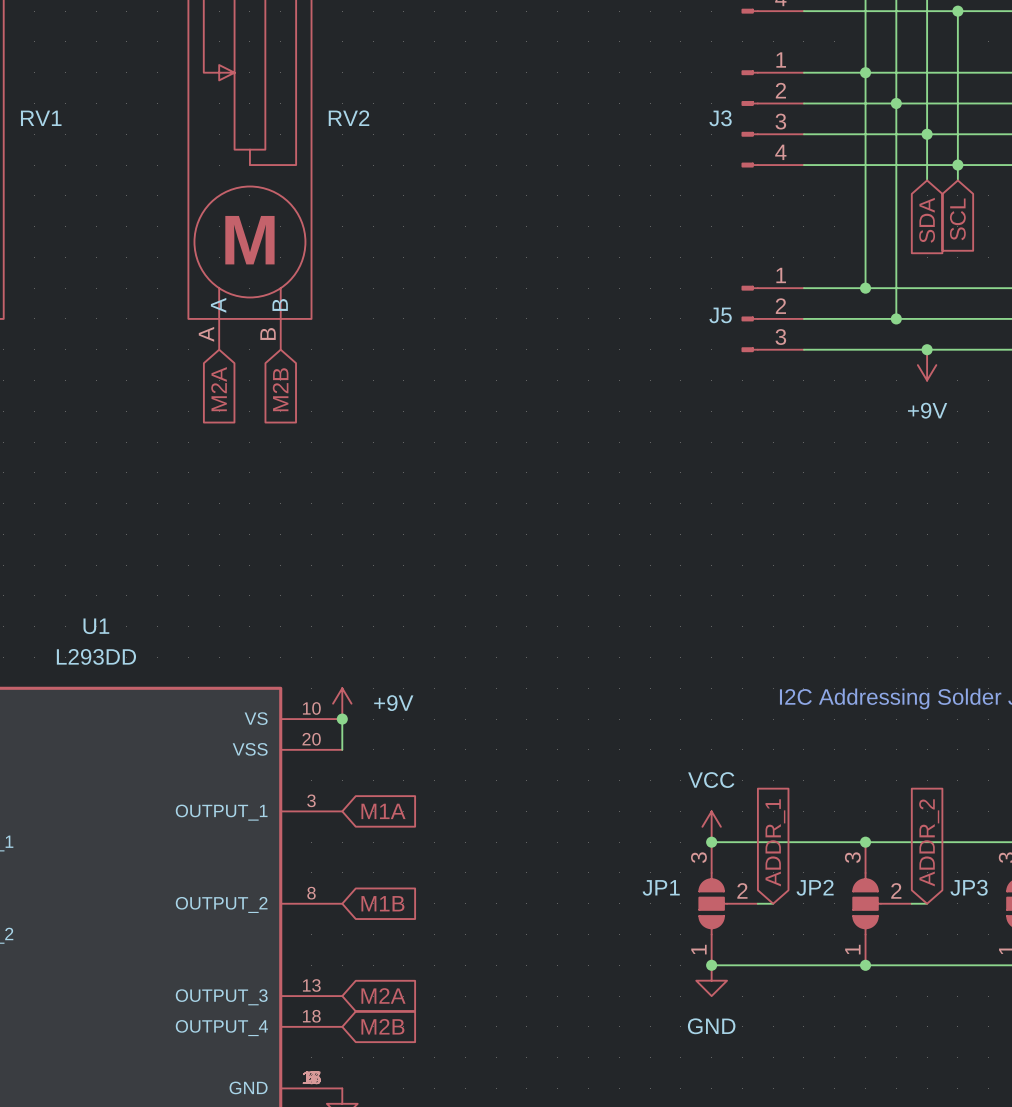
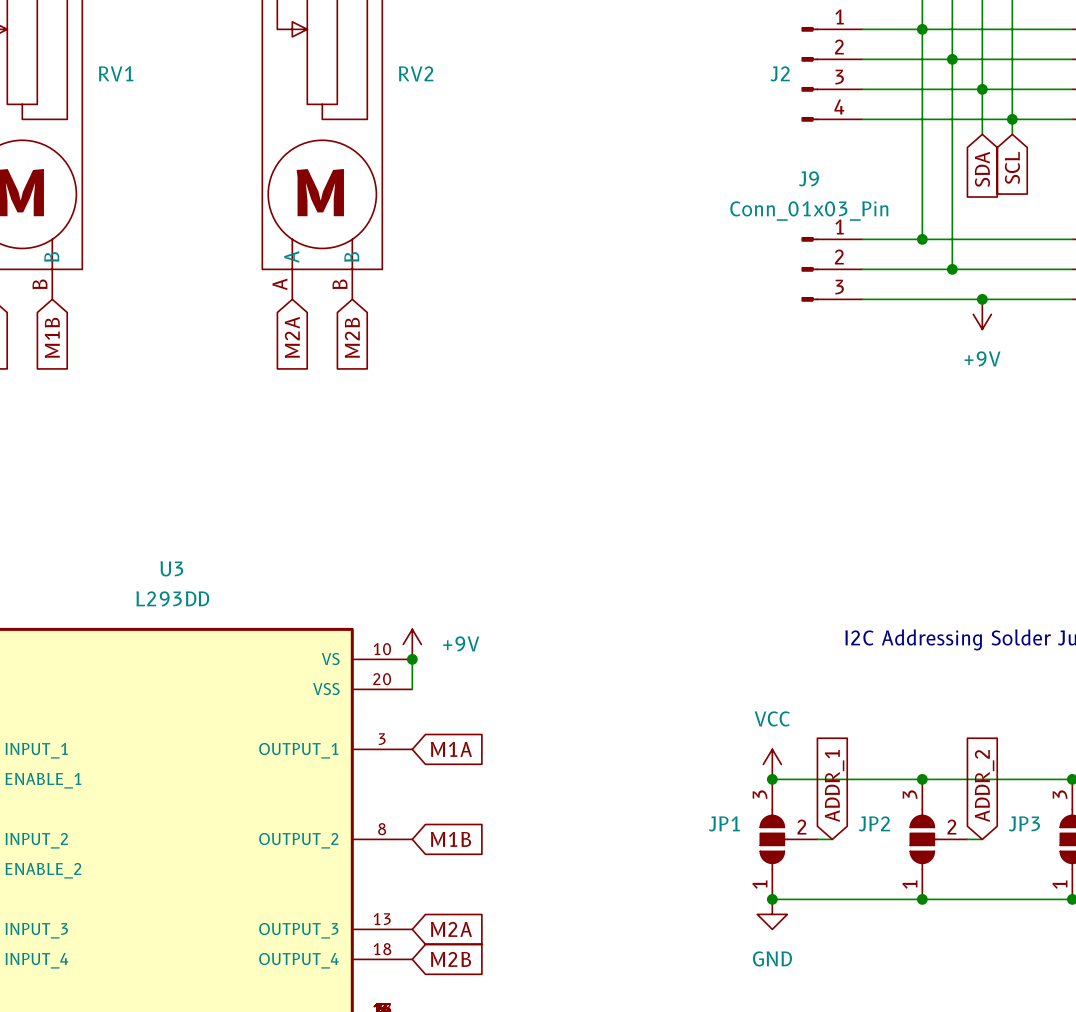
J3 name: J3 (720, 118) -> J2 (780, 73)
J5 value: none -> Conn_01x03_Pin (809, 211)
J5 name: J5 (720, 315) -> J9 (808, 178)
U1 name: U1 (96, 626) -> U3 (171, 568)

